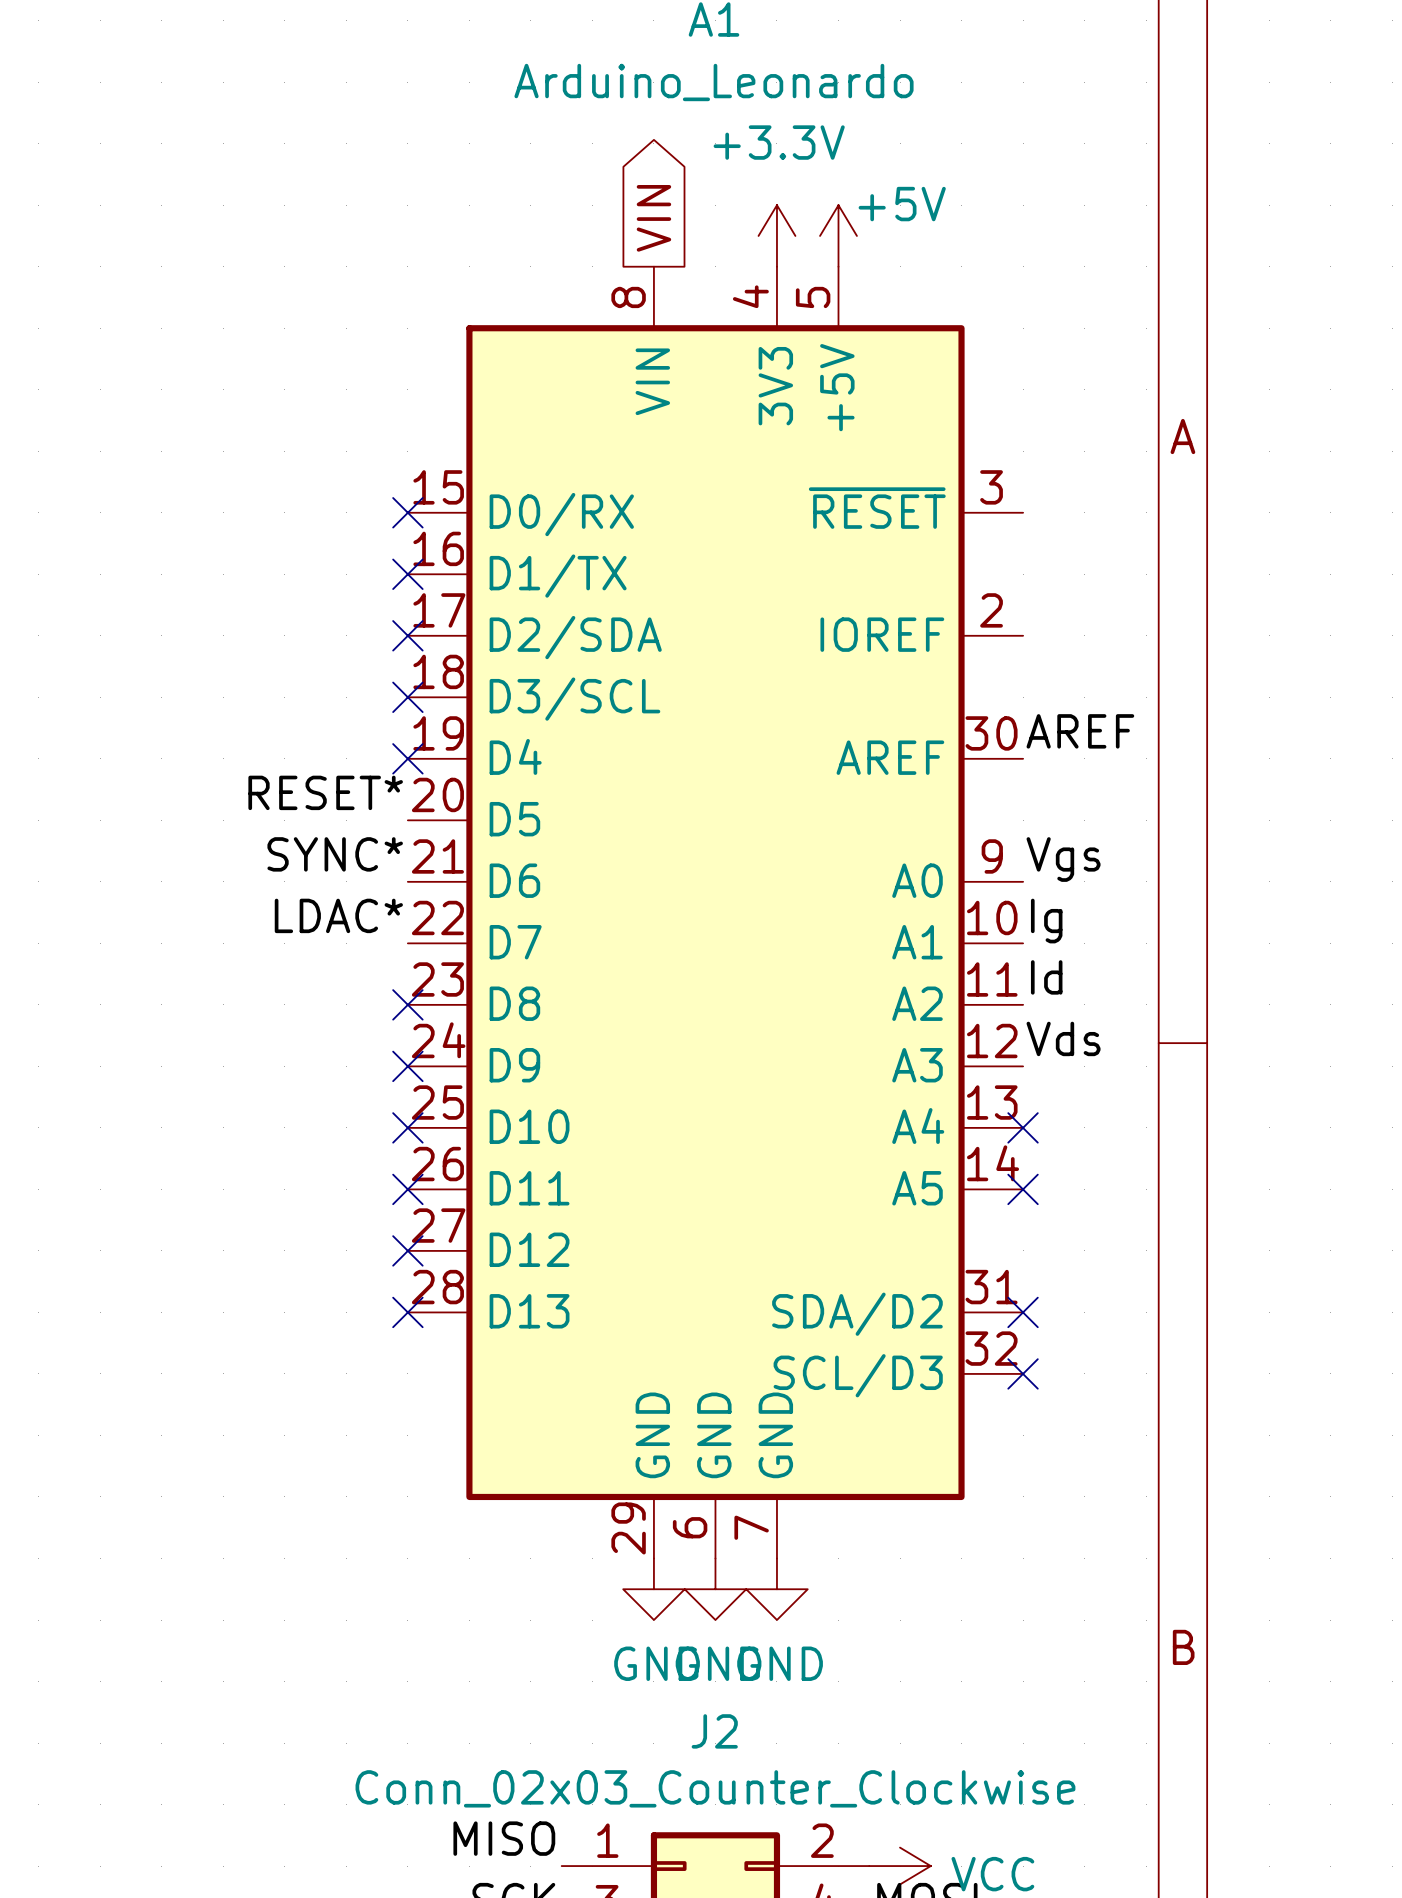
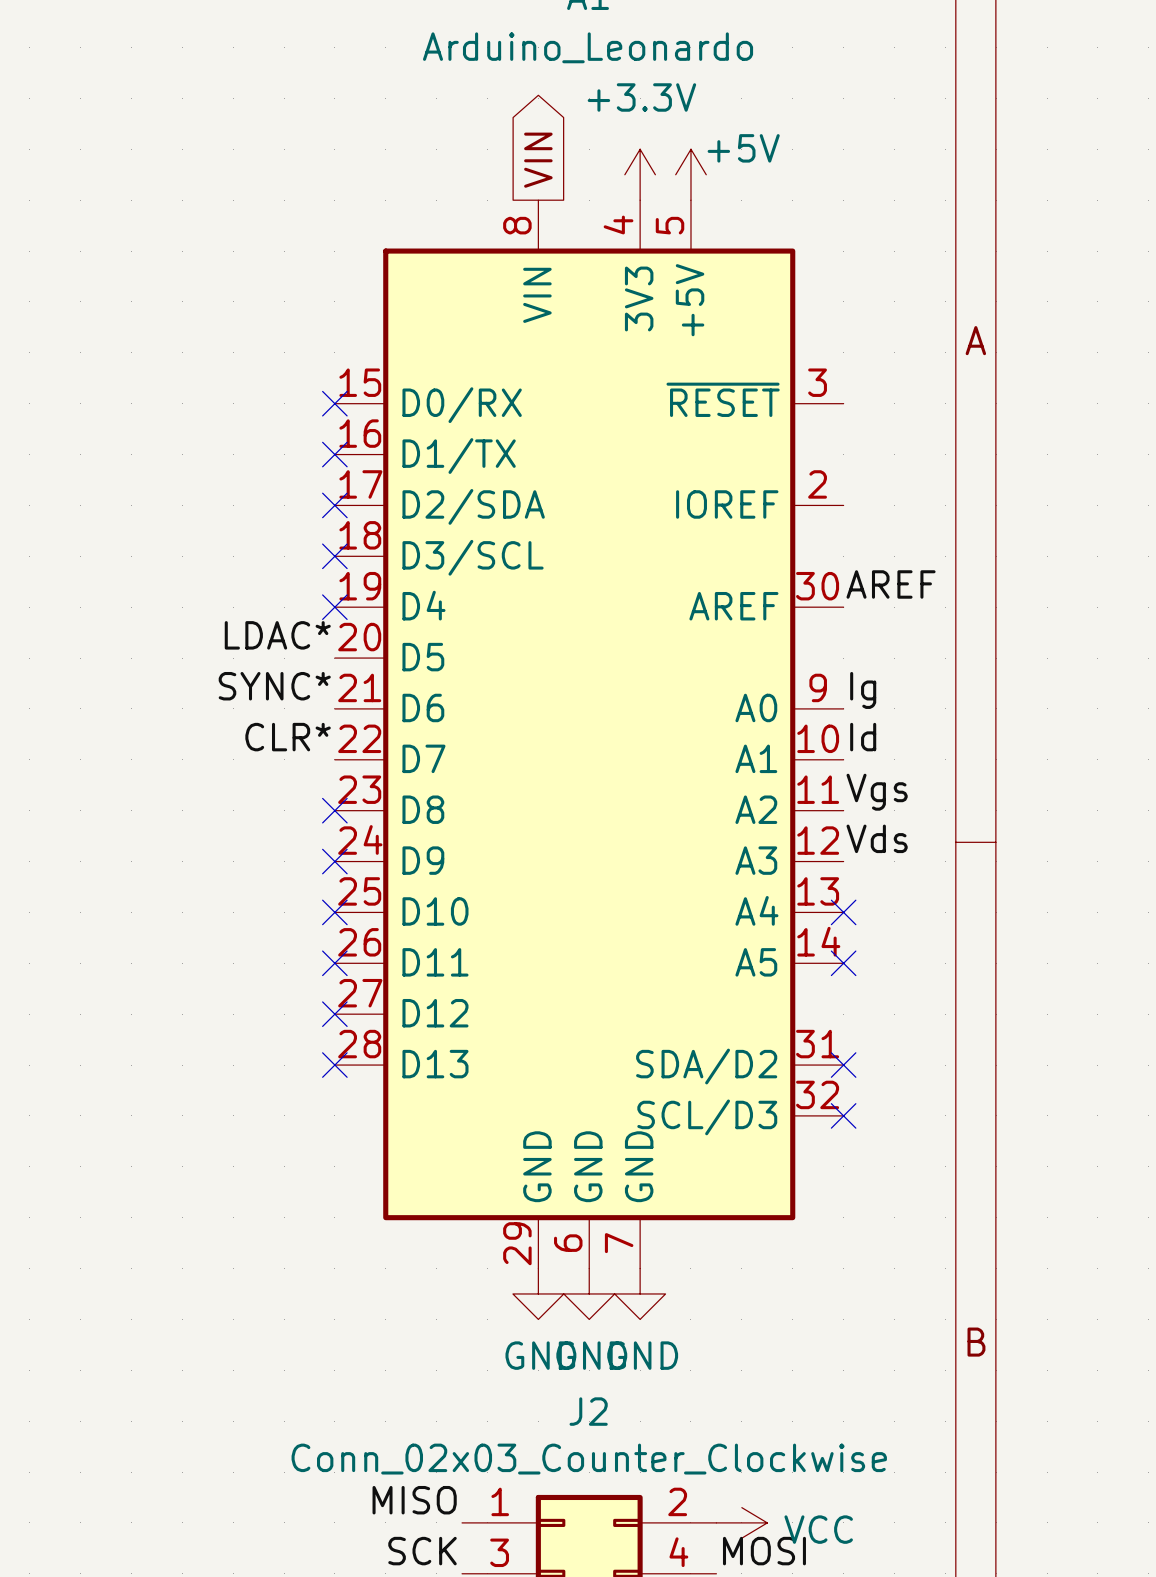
label: RESET* (325, 792) -> LDAC* (277, 635)
label: Vgs (1063, 859) -> Ig (863, 690)
label: LDAC* (338, 915) -> CLR* (288, 737)
label: Ig (1046, 921) -> Id (863, 737)
label: Id (1046, 977) -> Vgs (877, 792)

